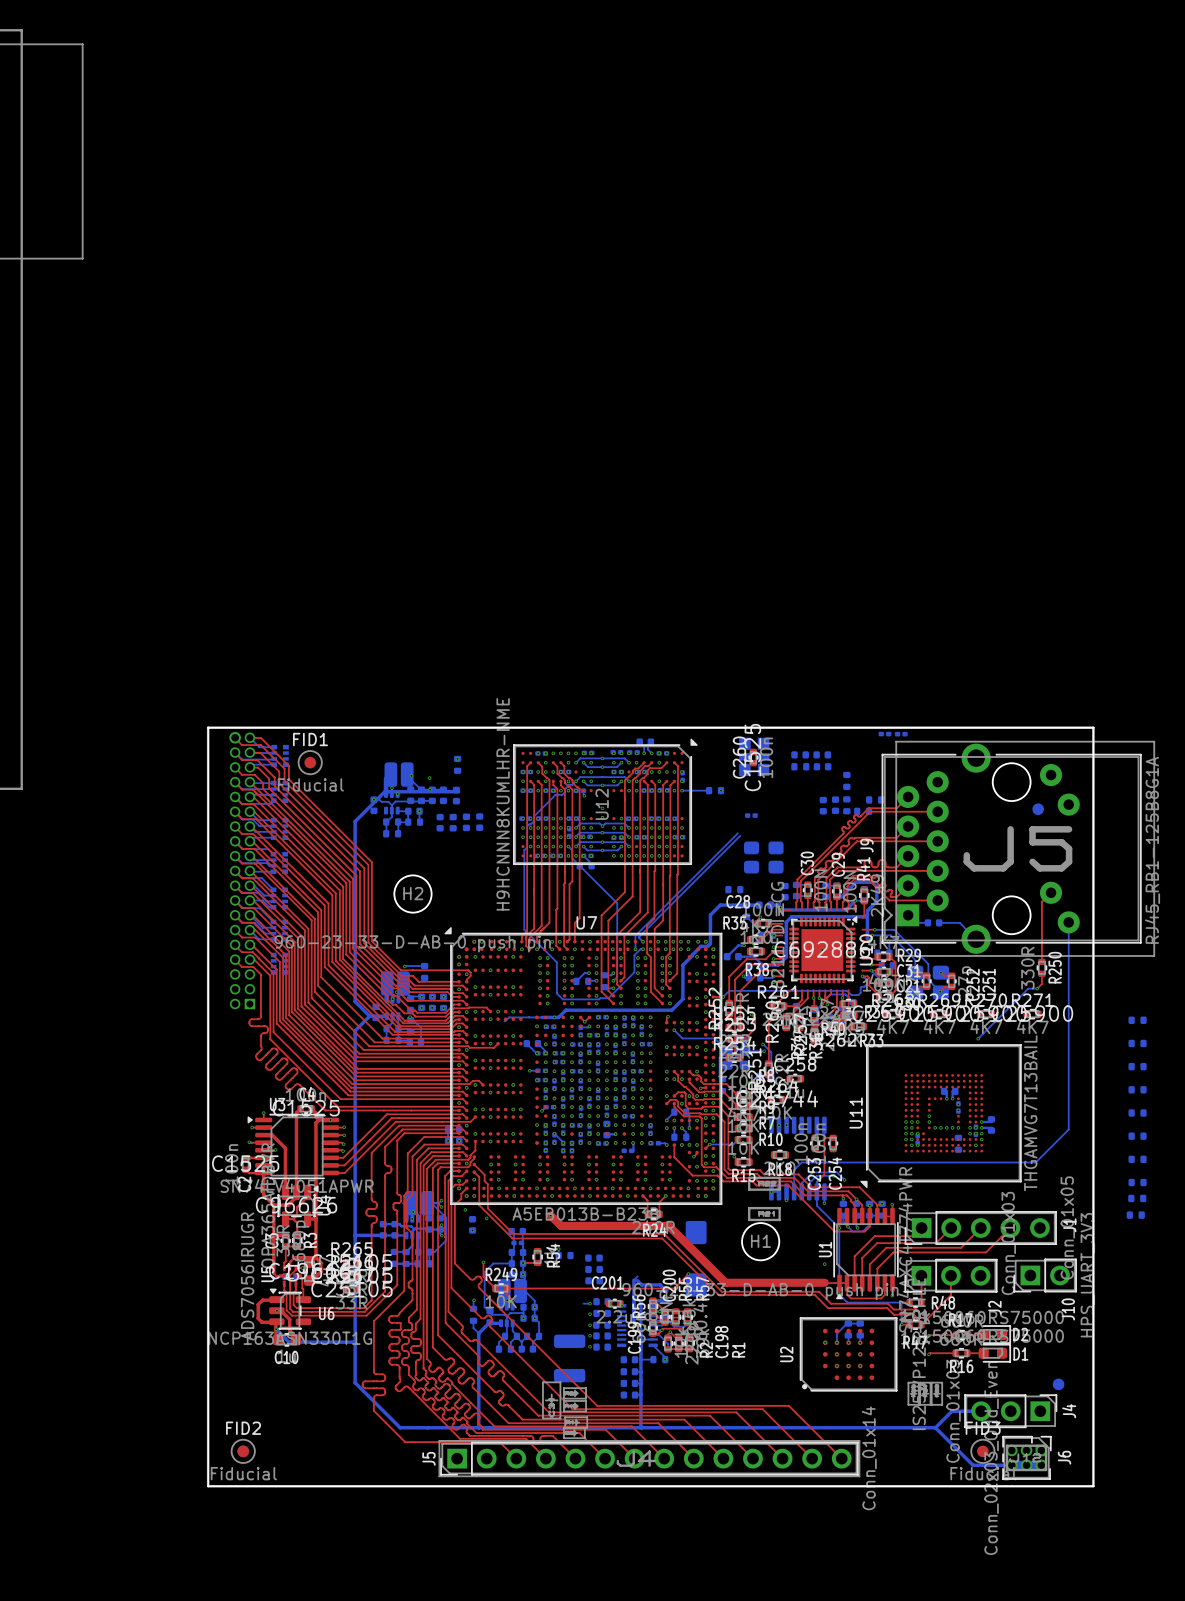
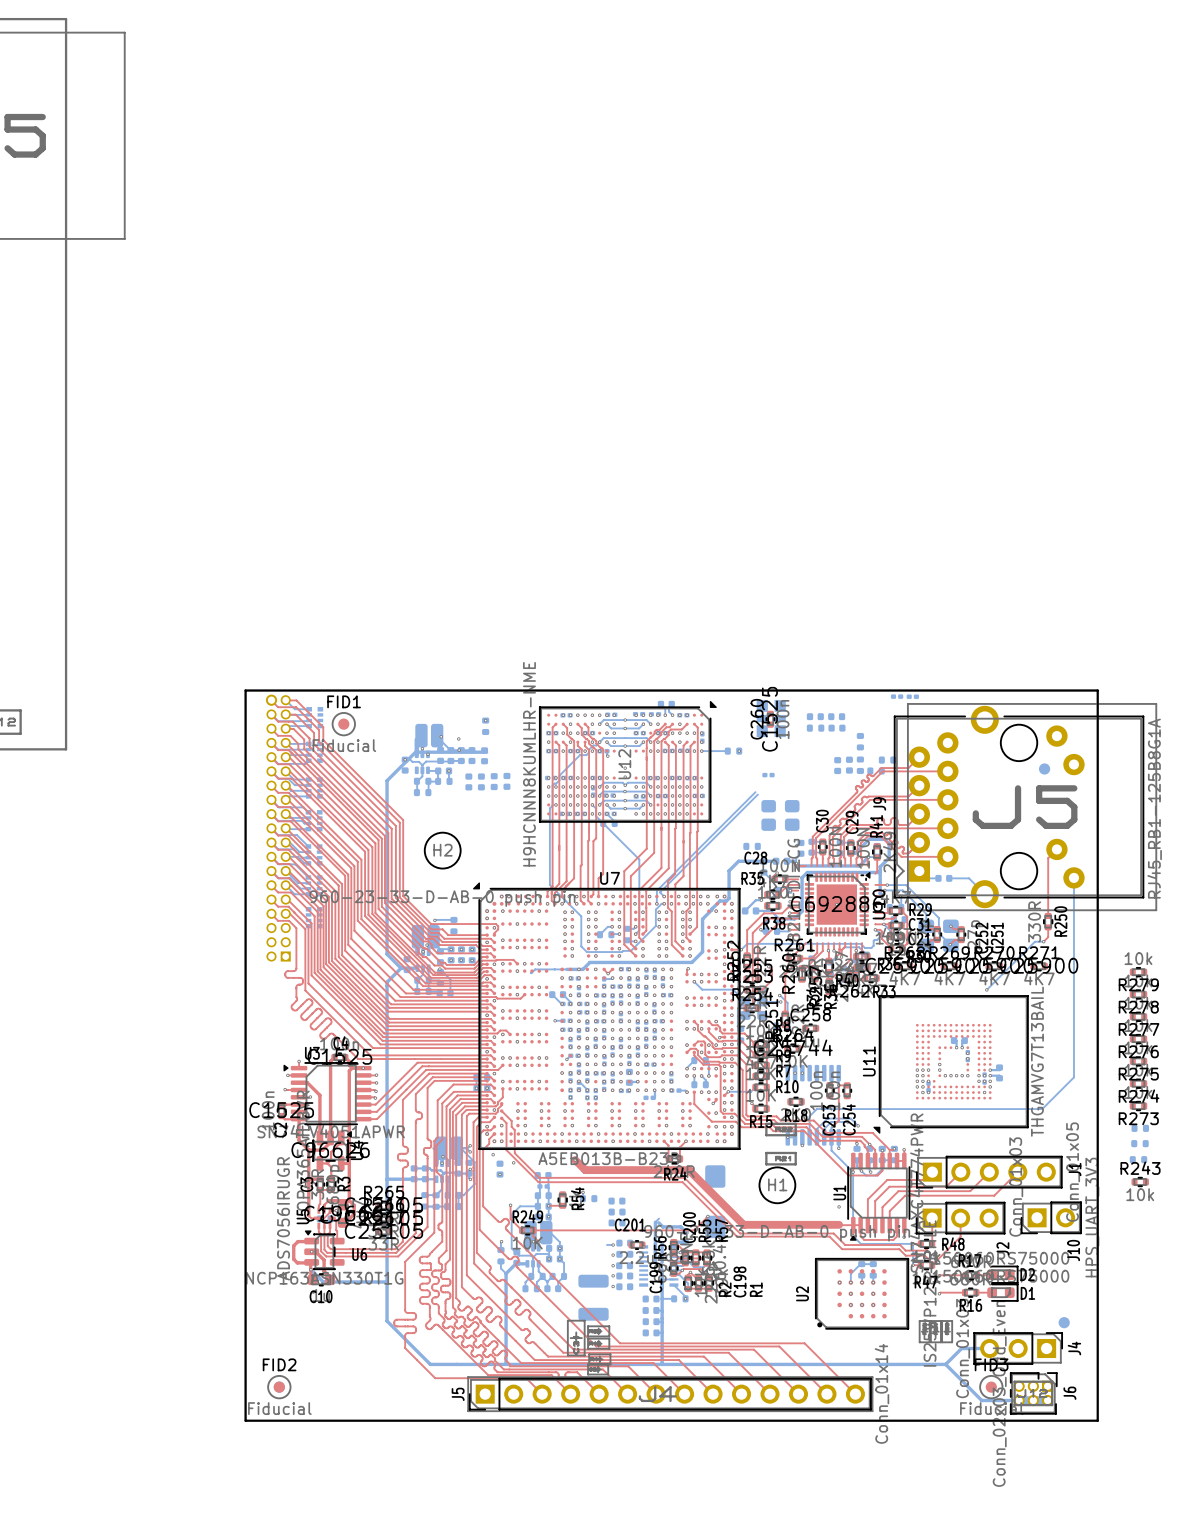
R279 side: bottom (1137, 1020) -> top (1138, 972)
R278 side: bottom (1137, 1043) -> top (1138, 994)
R277 side: bottom (1137, 1066) -> top (1138, 1016)
R276 side: bottom (1137, 1089) -> top (1138, 1039)
R275 side: bottom (1137, 1112) -> top (1138, 1061)
R274 side: bottom (1137, 1136) -> top (1138, 1083)
R243 side: bottom (958, 1143) -> top (1140, 1182)
R273 side: bottom (1137, 1159) -> top (1138, 1106)

